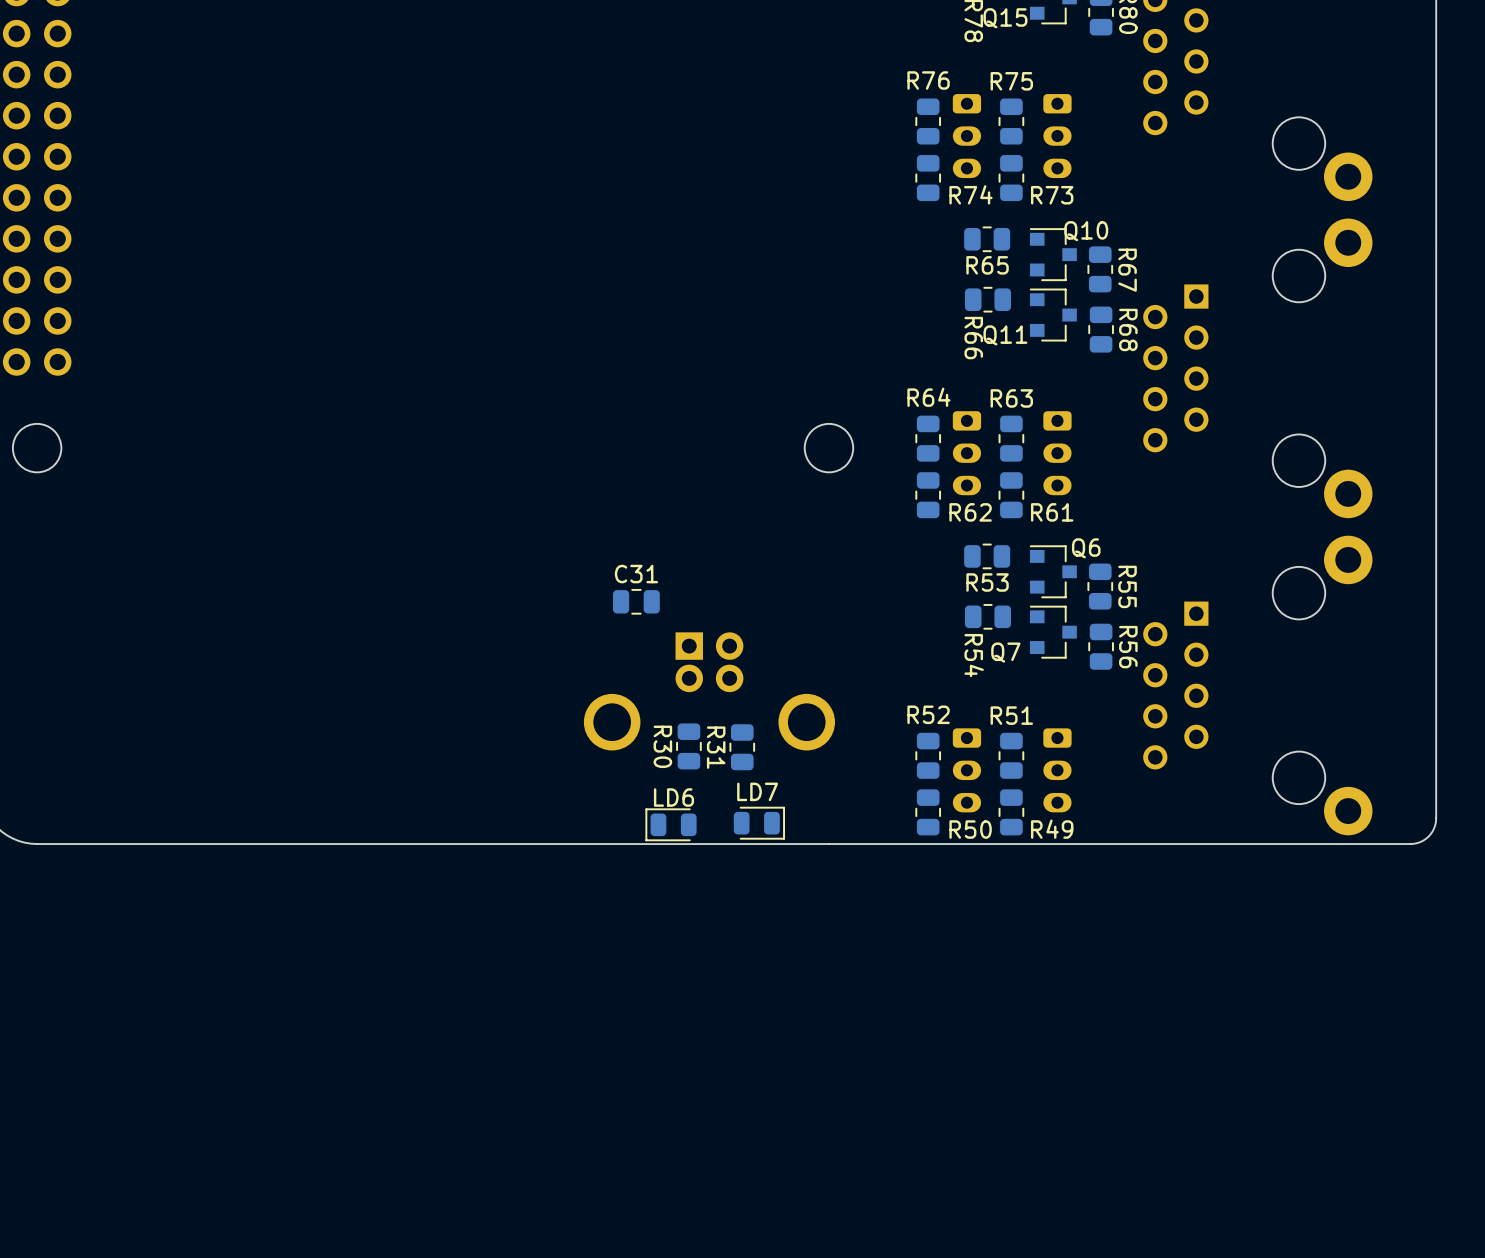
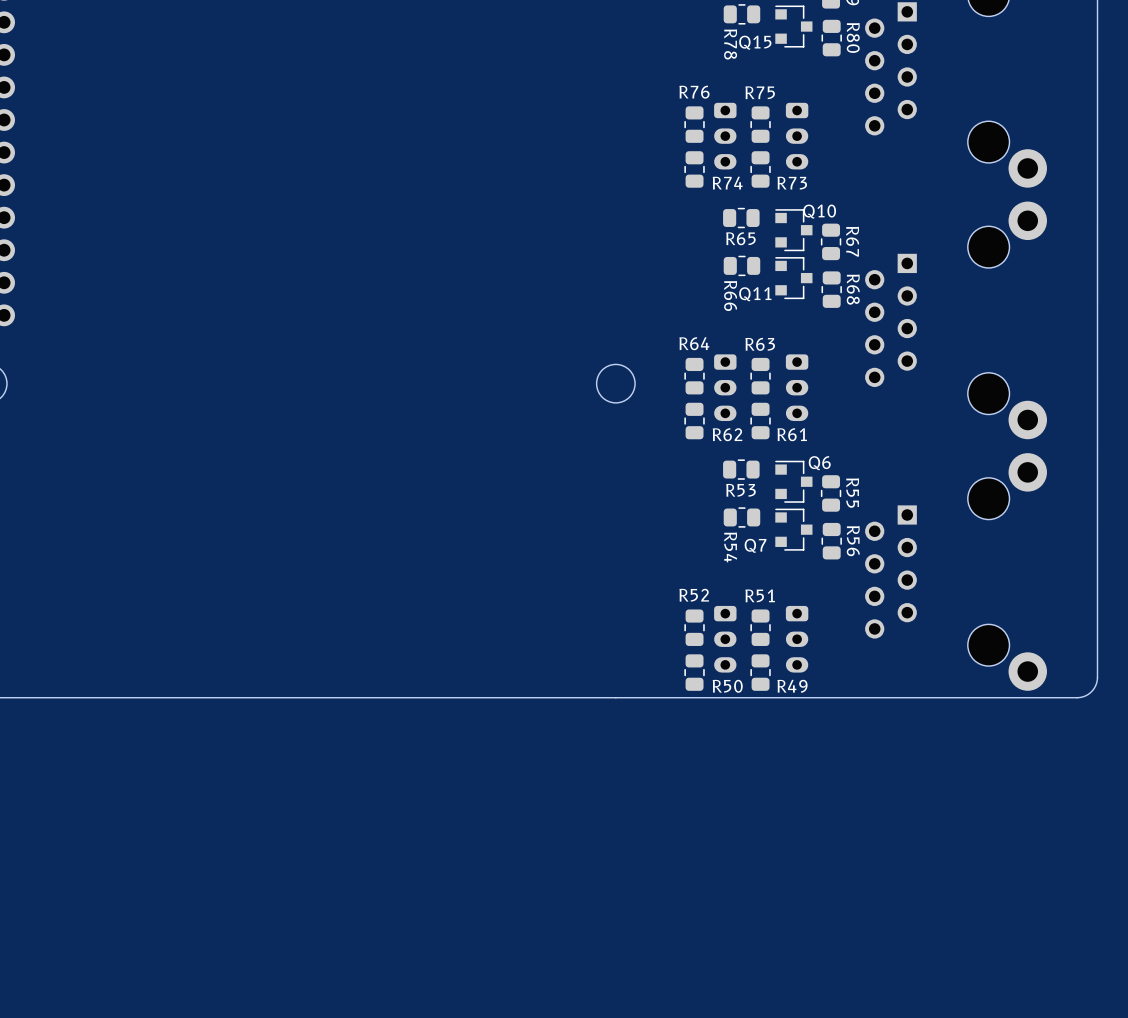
C31: (636, 601) -> none
part: (709, 691) -> none
R30: (688, 746) -> none
R31: (742, 747) -> none
LD7: (759, 823) -> none
LD6: (671, 824) -> none

